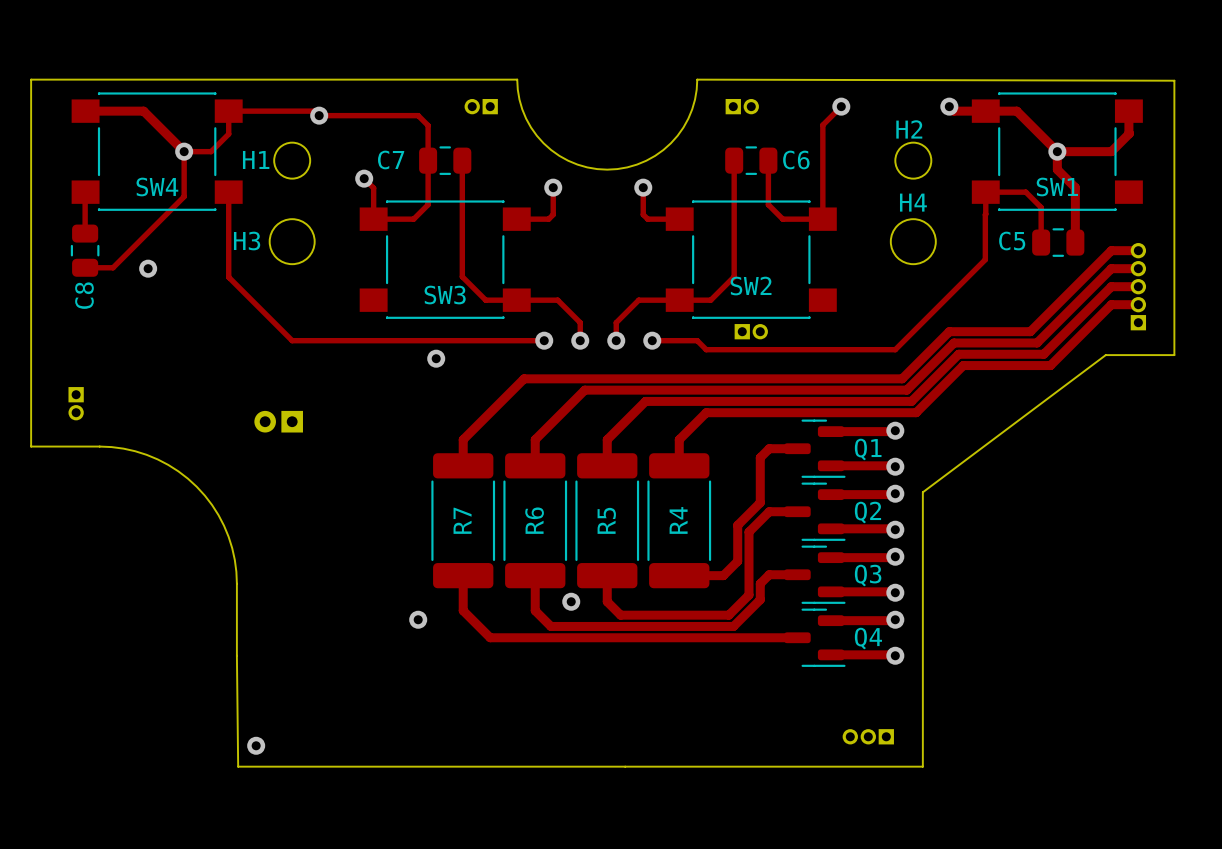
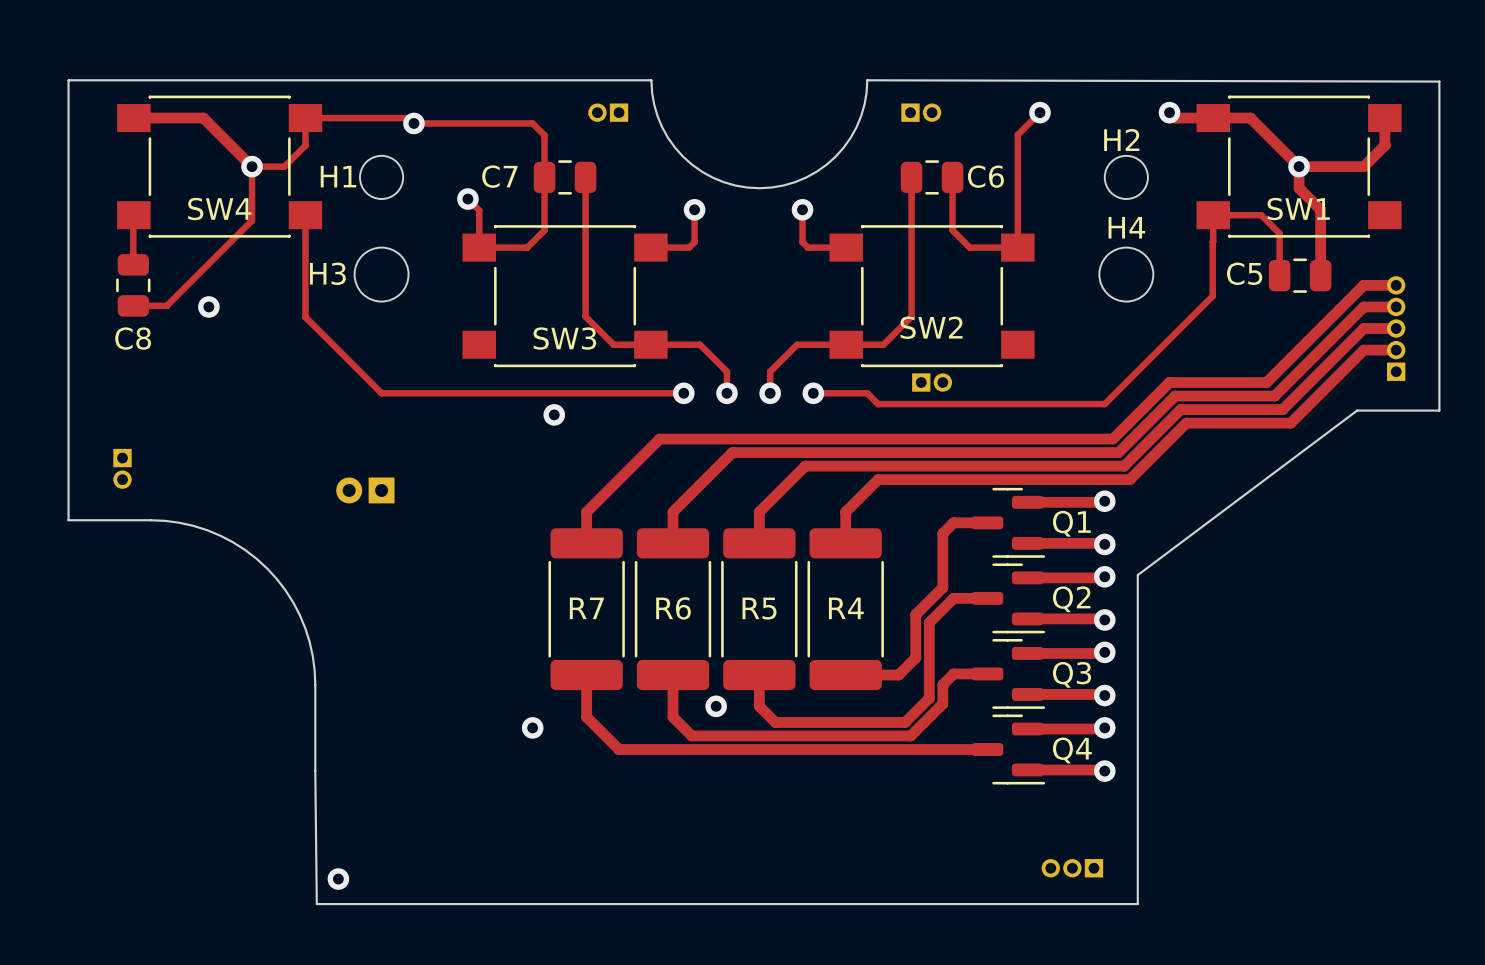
C8 name rotation: 0° (84, 295) -> 90° clockwise (133, 338)
R7 name rotation: 0° (462, 520) -> 90° clockwise (586, 608)
R6 name rotation: 0° (534, 520) -> 90° clockwise (673, 608)
R5 name rotation: 0° (606, 520) -> 90° clockwise (759, 608)
R4 name rotation: 0° (678, 520) -> 90° clockwise (846, 608)

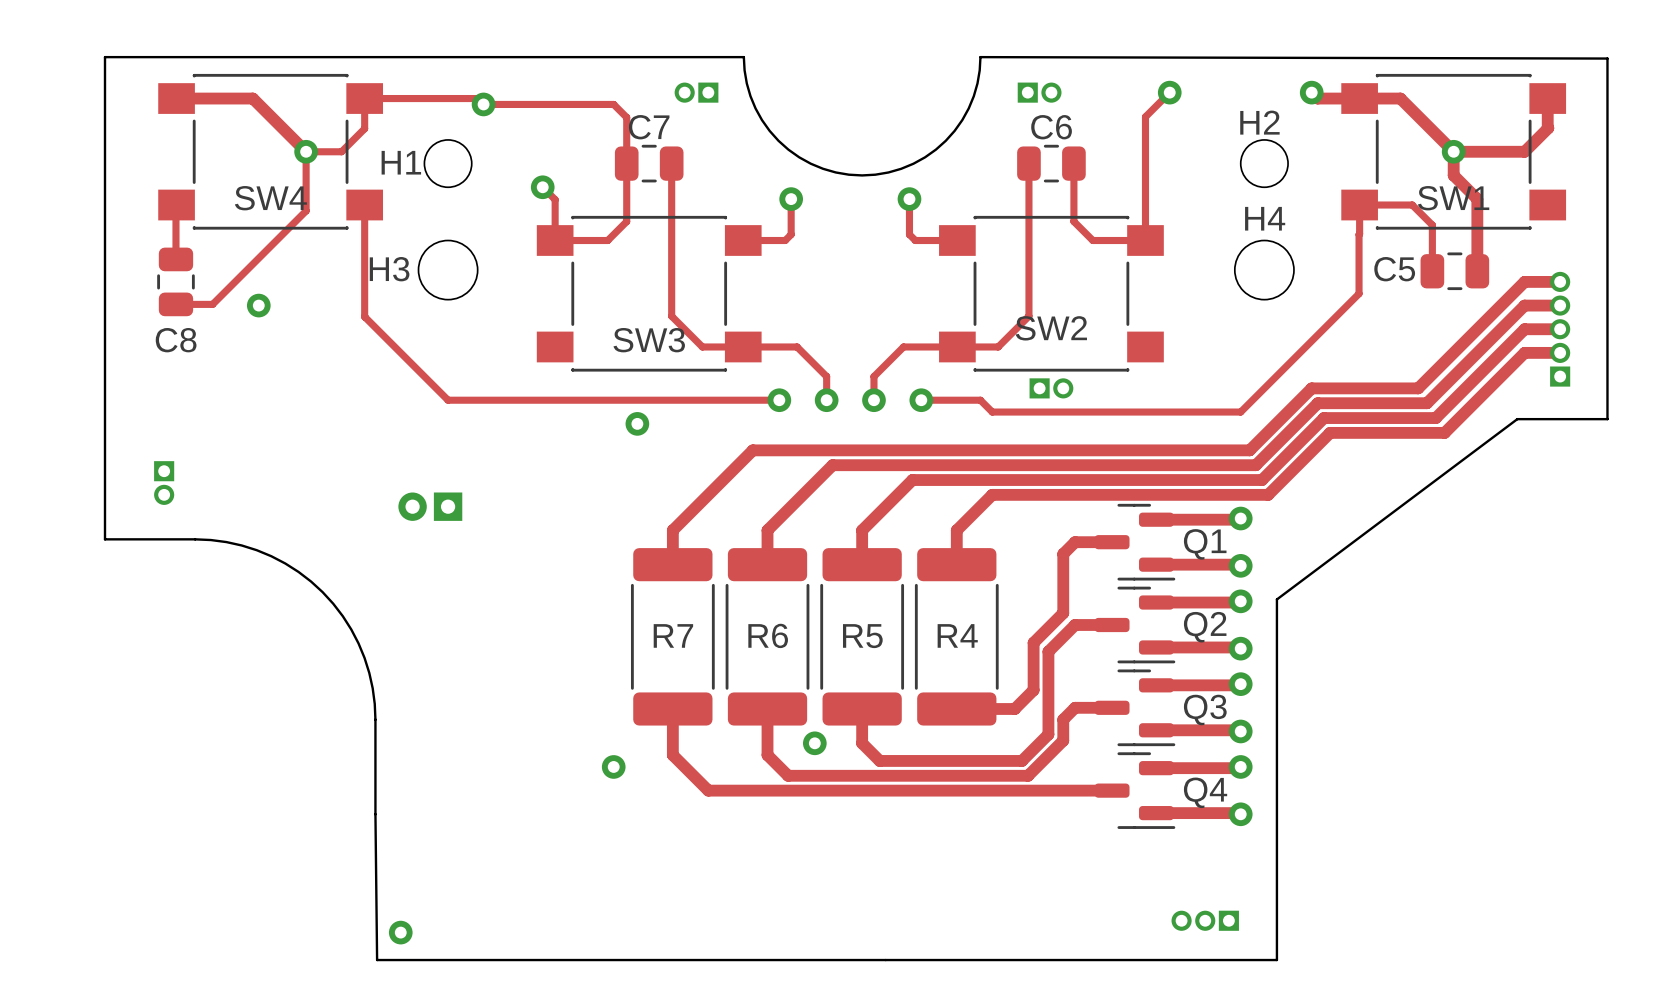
C7 name position: C7 (499, 176) -> C7 (649, 127)
C6 name position: C6 (985, 176) -> C6 (1051, 127)

